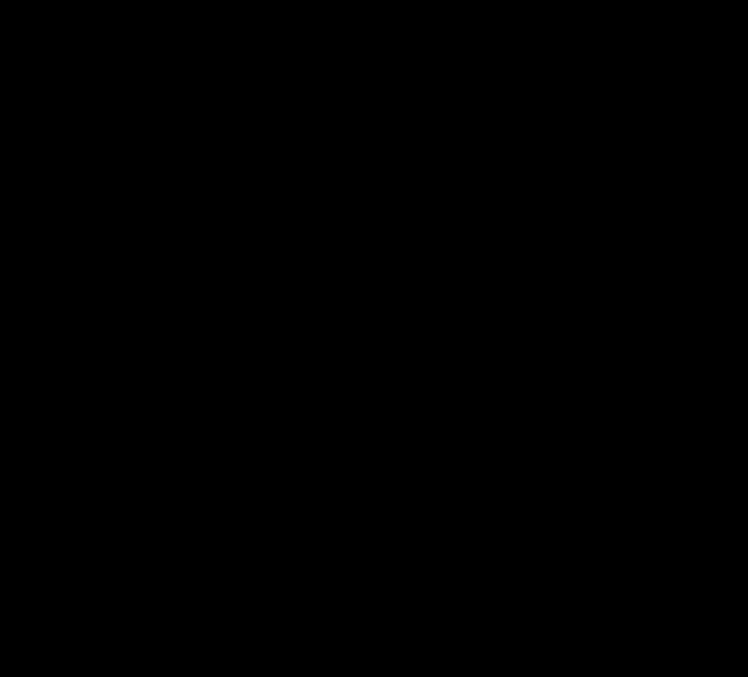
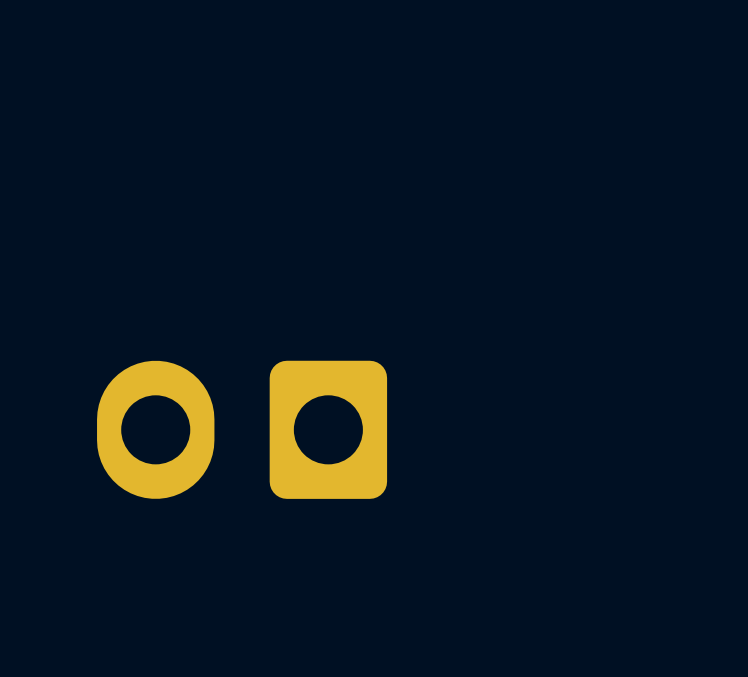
part: none -> (242, 429)

